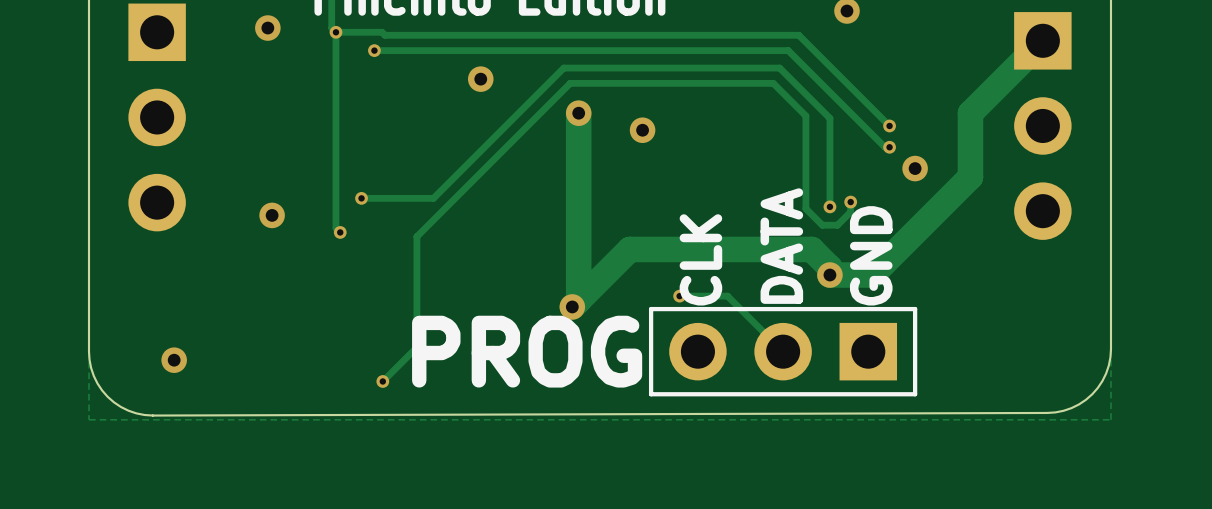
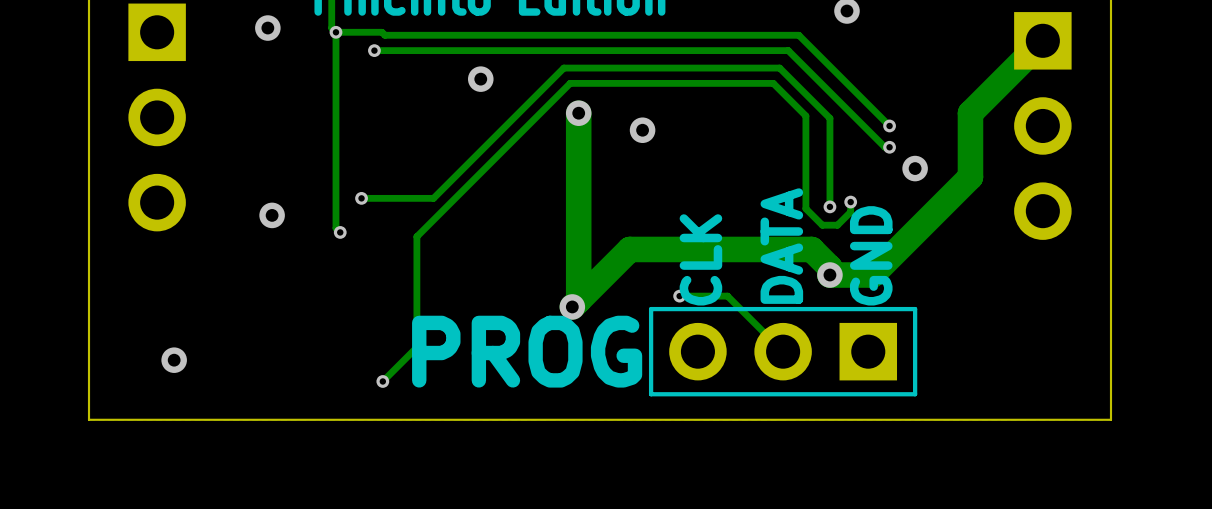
board edge: (1110, 349) (1106, 373) (1092, 394) (1079, 404) (1055, 412) (152, 415) (128, 410) (107, 396) (93, 376) (89, 351) -> (1110, 349) (1110, 419) (89, 419) (89, 351)

